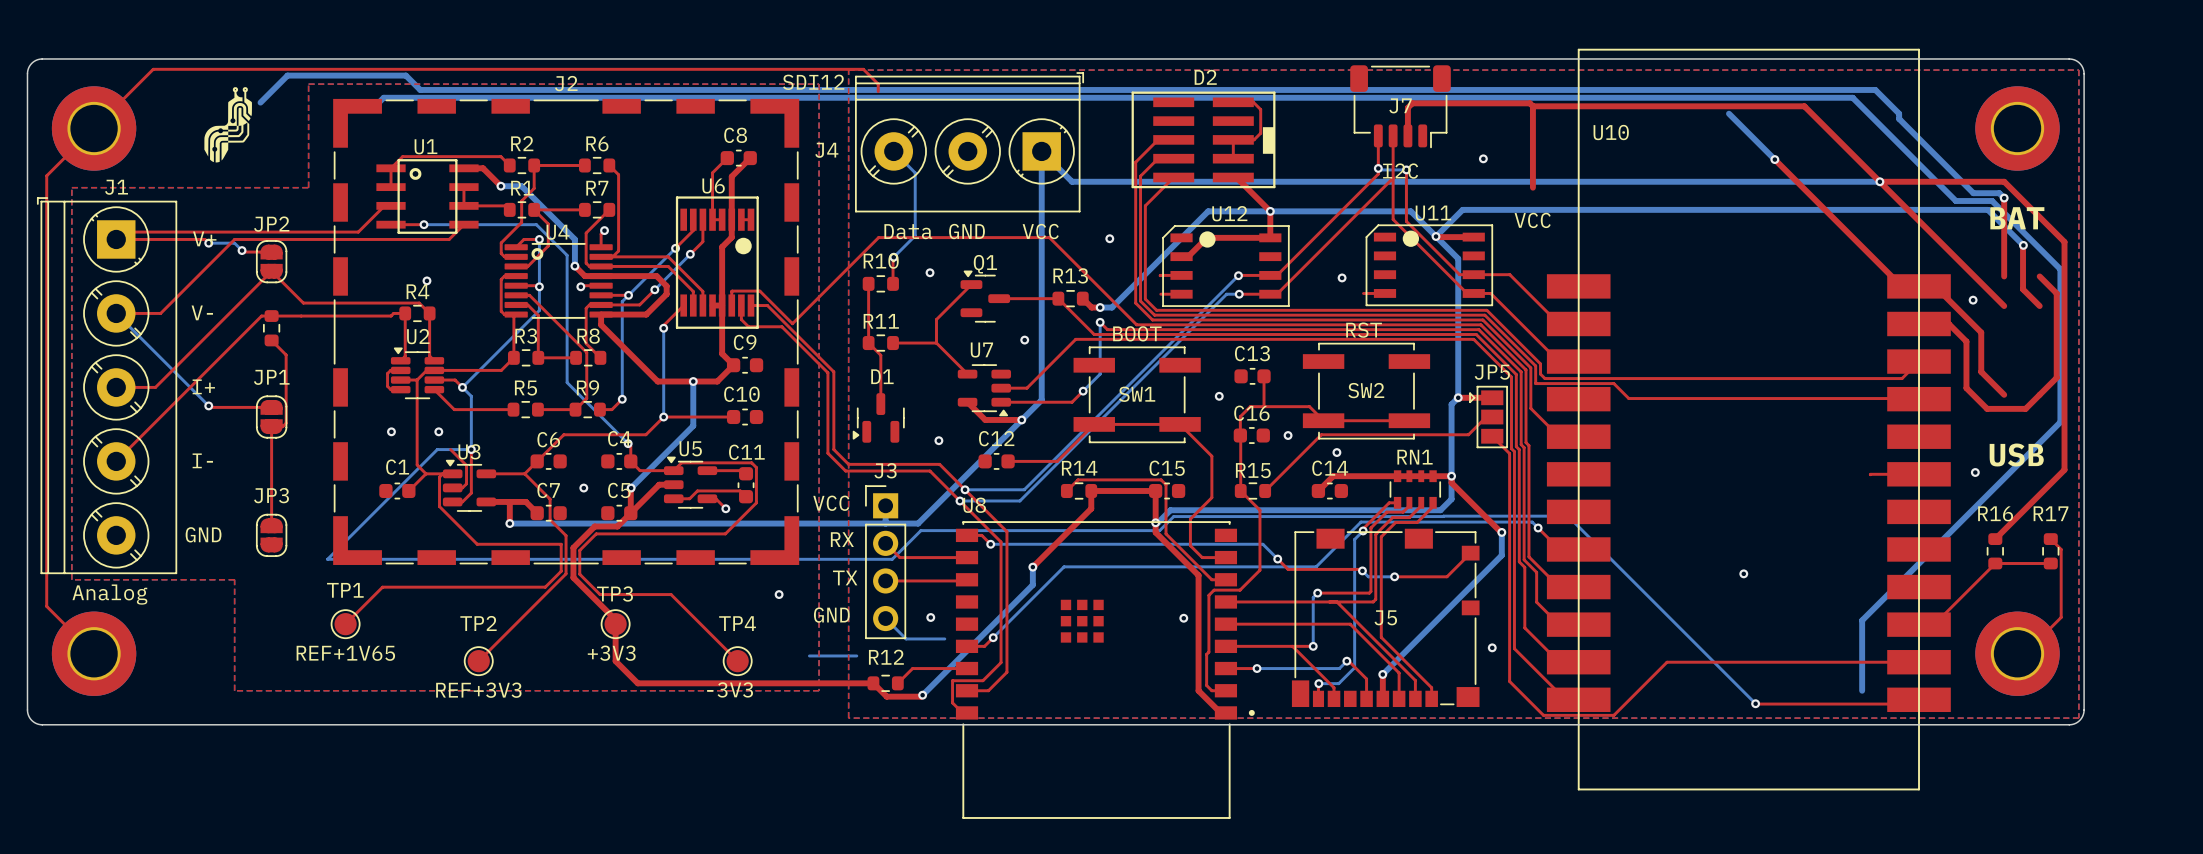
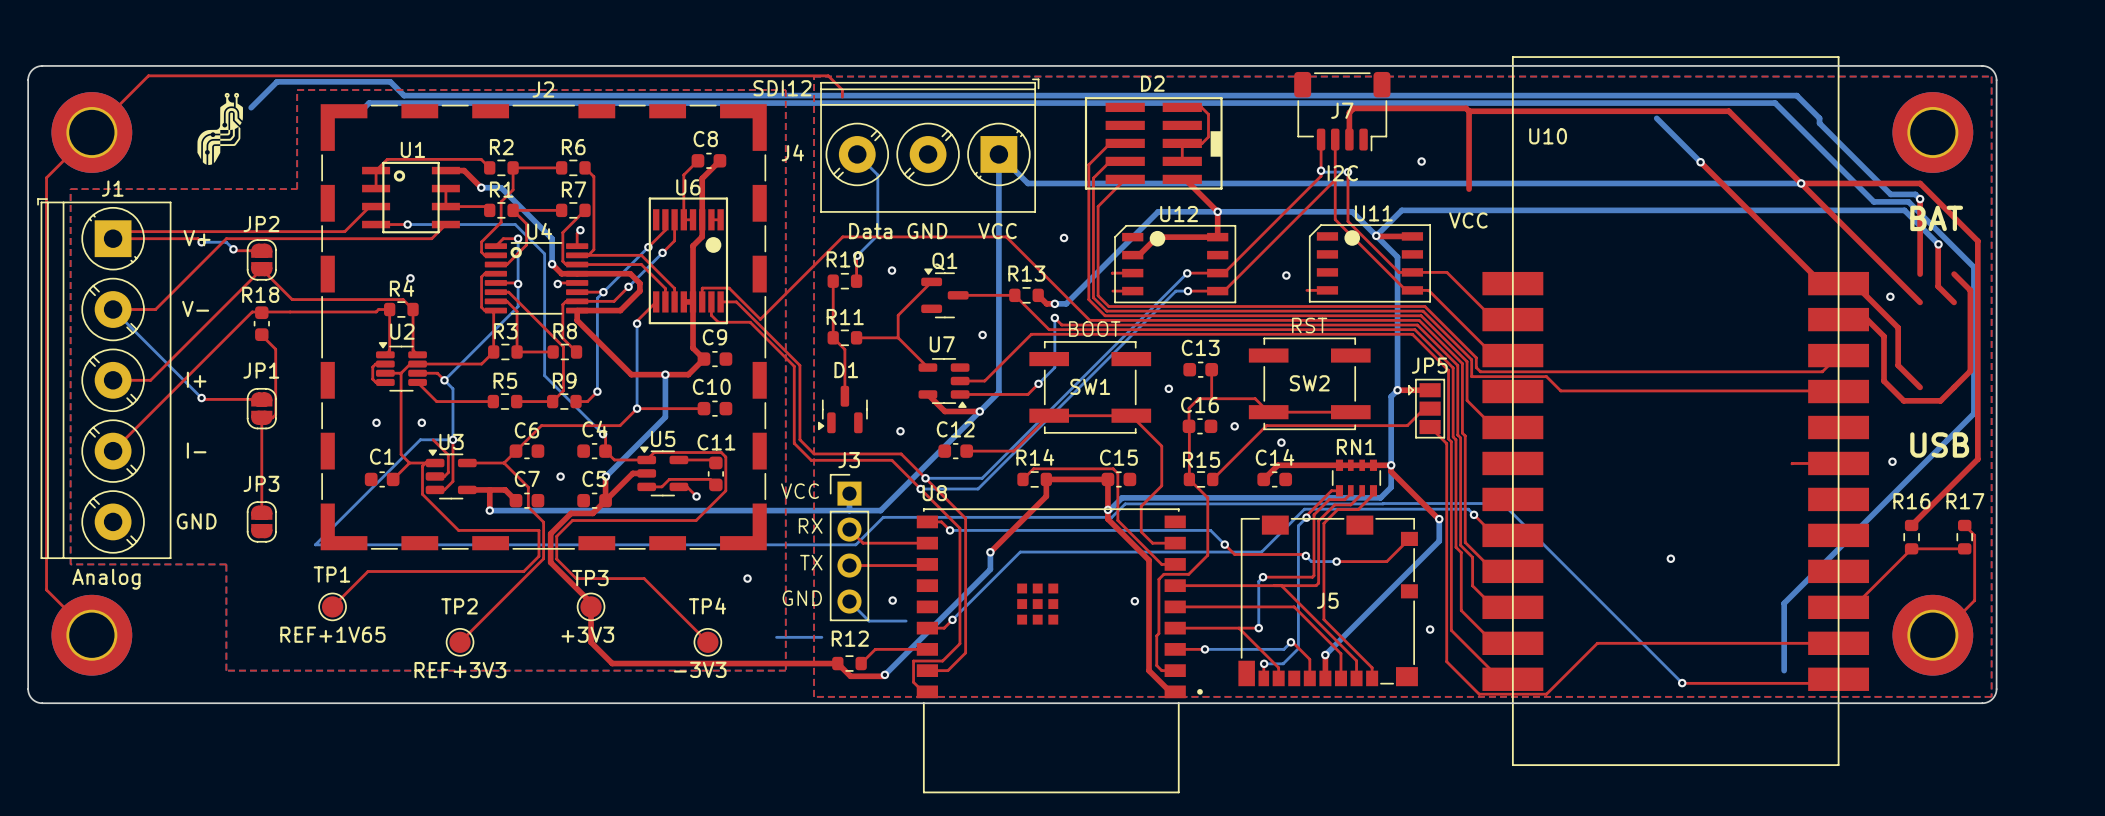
part: (271, 328) -> none
R18: none -> (261, 323)

